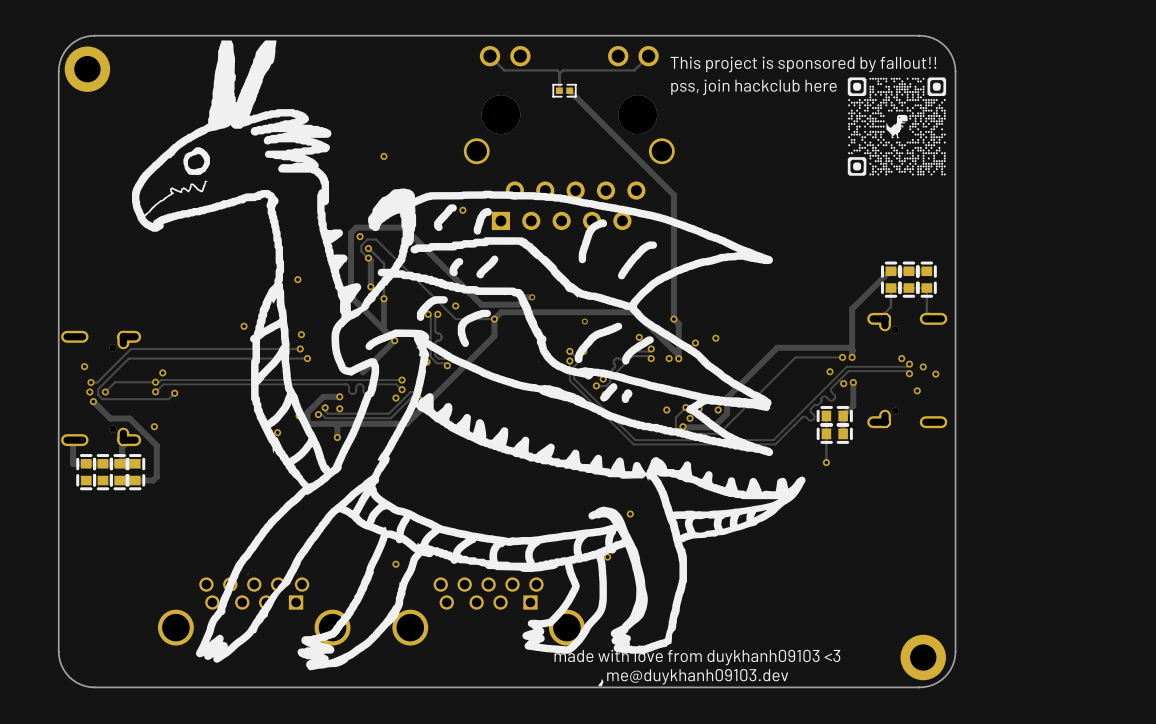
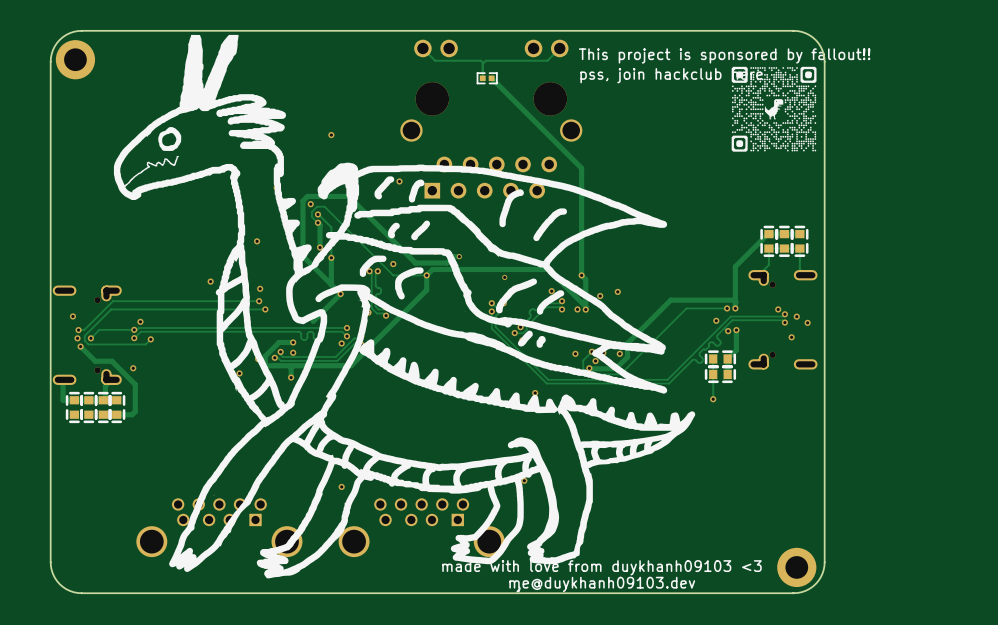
via position: (630, 514) -> (535, 393)

